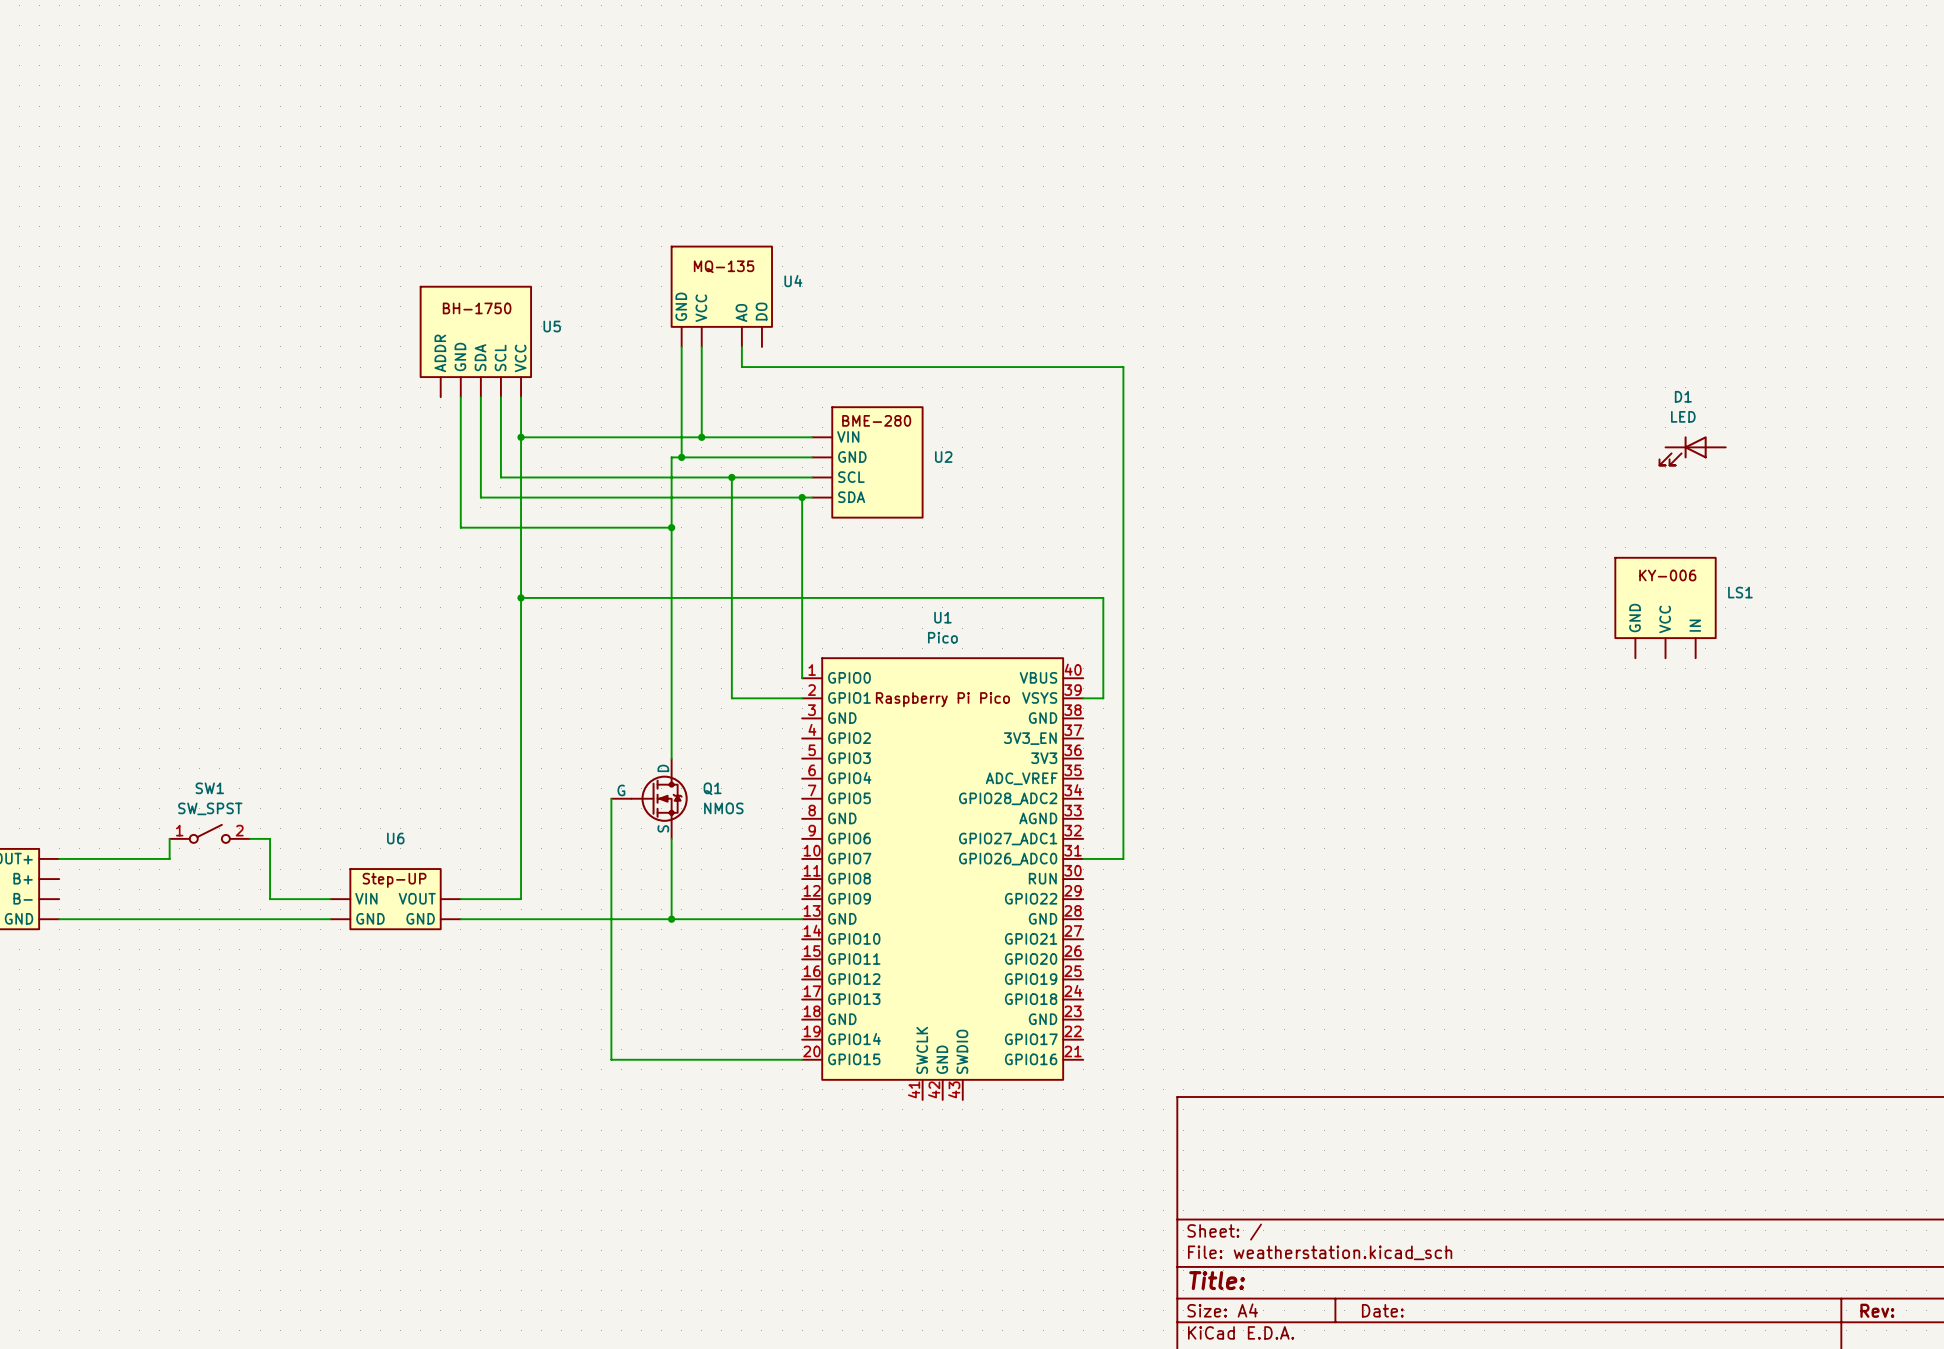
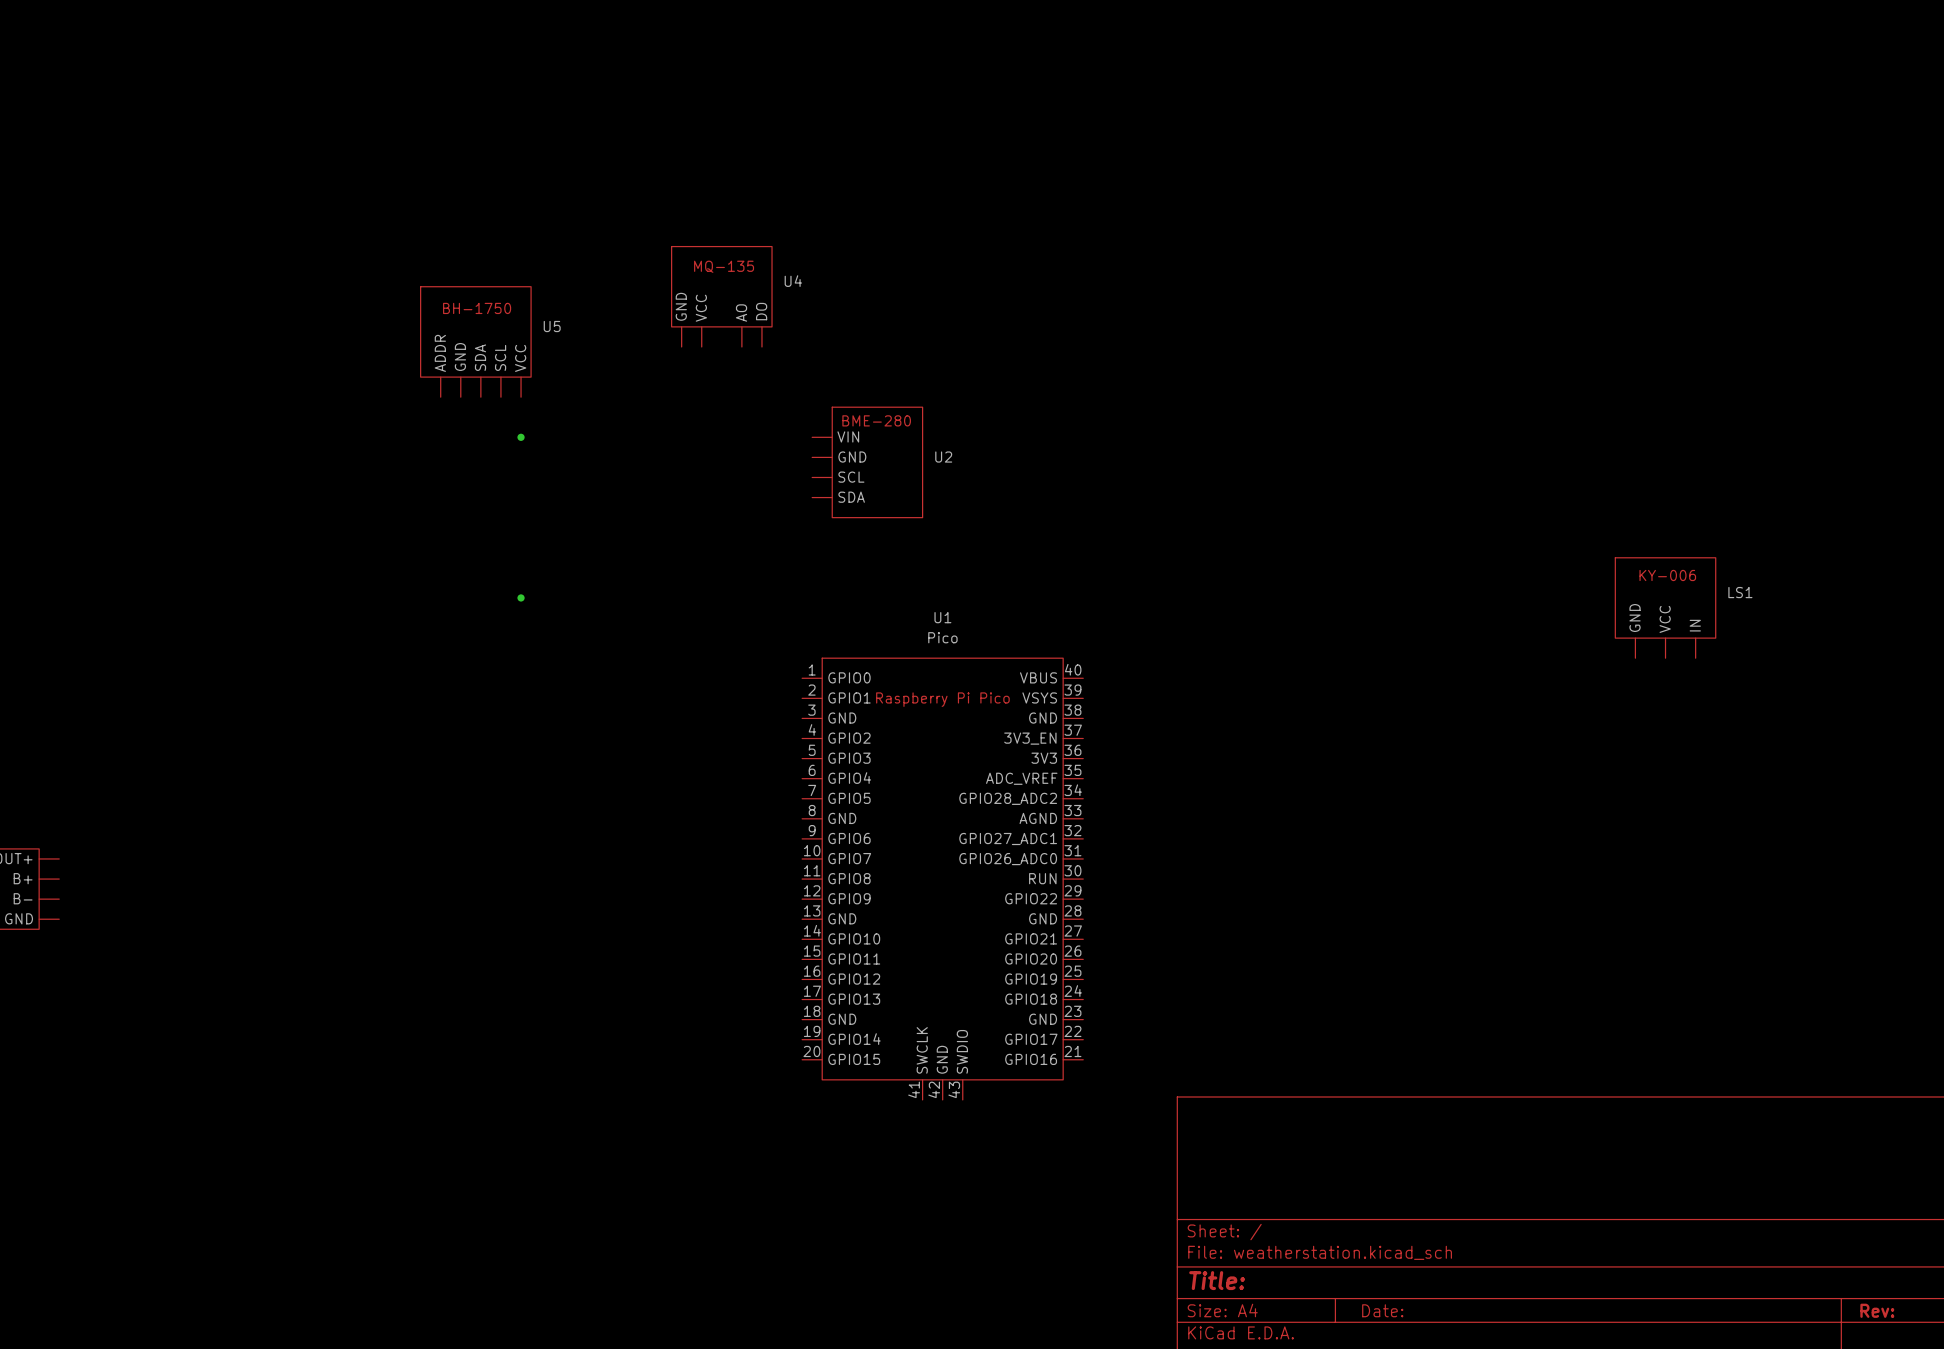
wire: (681, 346) (681, 457) -> none
wire: (701, 346) (701, 437) -> none
wire: (741, 346) (741, 367) (1123, 367) (1123, 858) (1083, 858) -> none
wire: (460, 397) (460, 527) (671, 527) -> none
wire: (480, 397) (480, 497) (812, 497) -> none
wire: (500, 397) (500, 477) (812, 477) -> none
wire: (521, 397) (521, 899) (460, 899) -> none
wire: (521, 437) (812, 437) -> none
junction: (701, 437) -> none
D1: LED (1692, 450) -> none
junction: (681, 457) -> none
wire: (812, 457) (671, 457) (671, 758) -> none
wire: (731, 477) (731, 698) (802, 698) -> none
junction: (731, 477) -> none
wire: (802, 497) (802, 678) -> none
junction: (802, 497) -> none
junction: (671, 527) -> none
wire: (521, 597) (1103, 597) (1103, 698) (1083, 698) -> none
wire: (611, 798) (611, 1059) (802, 1059) -> none
Q1: NMOS (649, 798) -> none
SW1: SW_SPST (209, 833) -> none
wire: (169, 838) (169, 858) (59, 858) -> none
wire: (249, 838) (270, 838) (270, 899) (330, 899) -> none
wire: (671, 838) (671, 919) -> none
U6: (395, 899) -> none
wire: (59, 919) (330, 919) -> none
wire: (460, 919) (802, 919) -> none
junction: (671, 919) -> none

